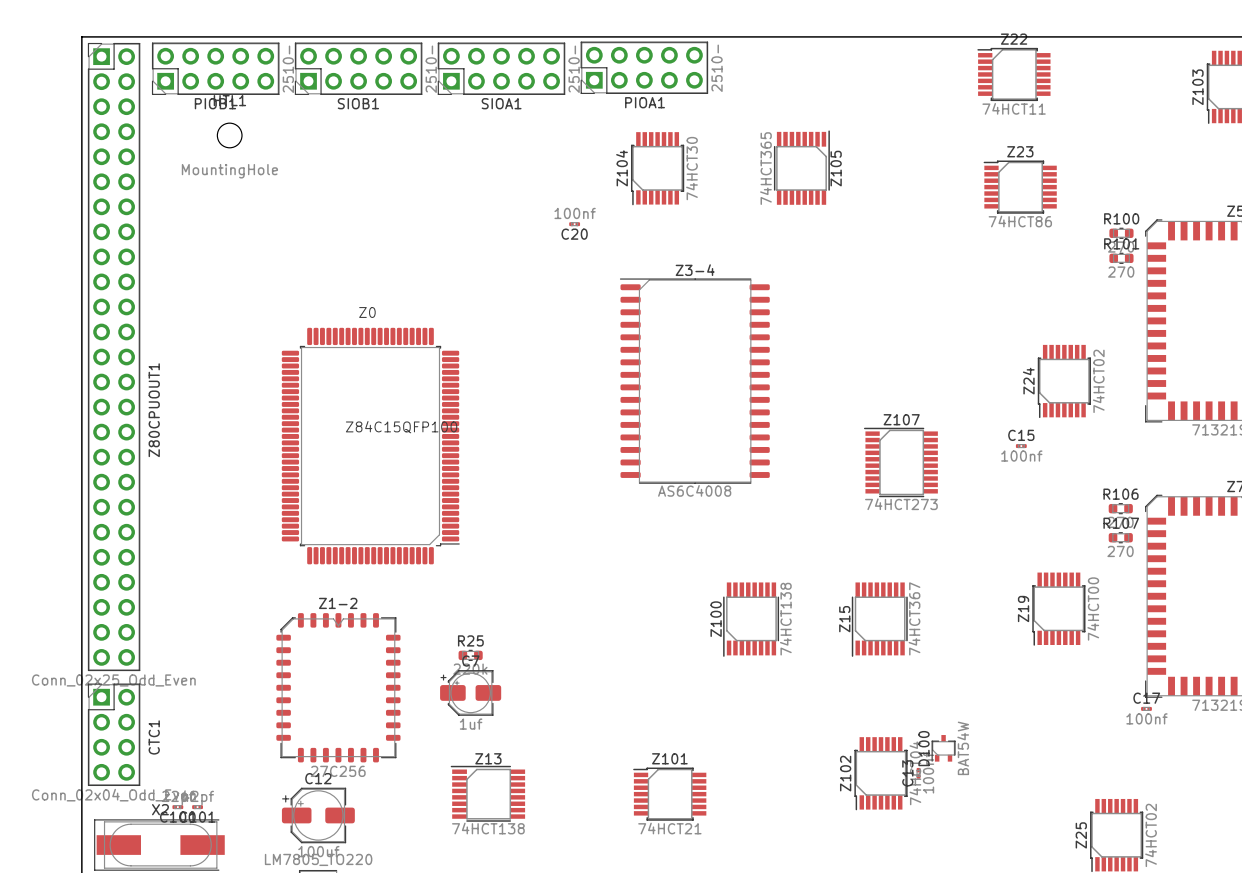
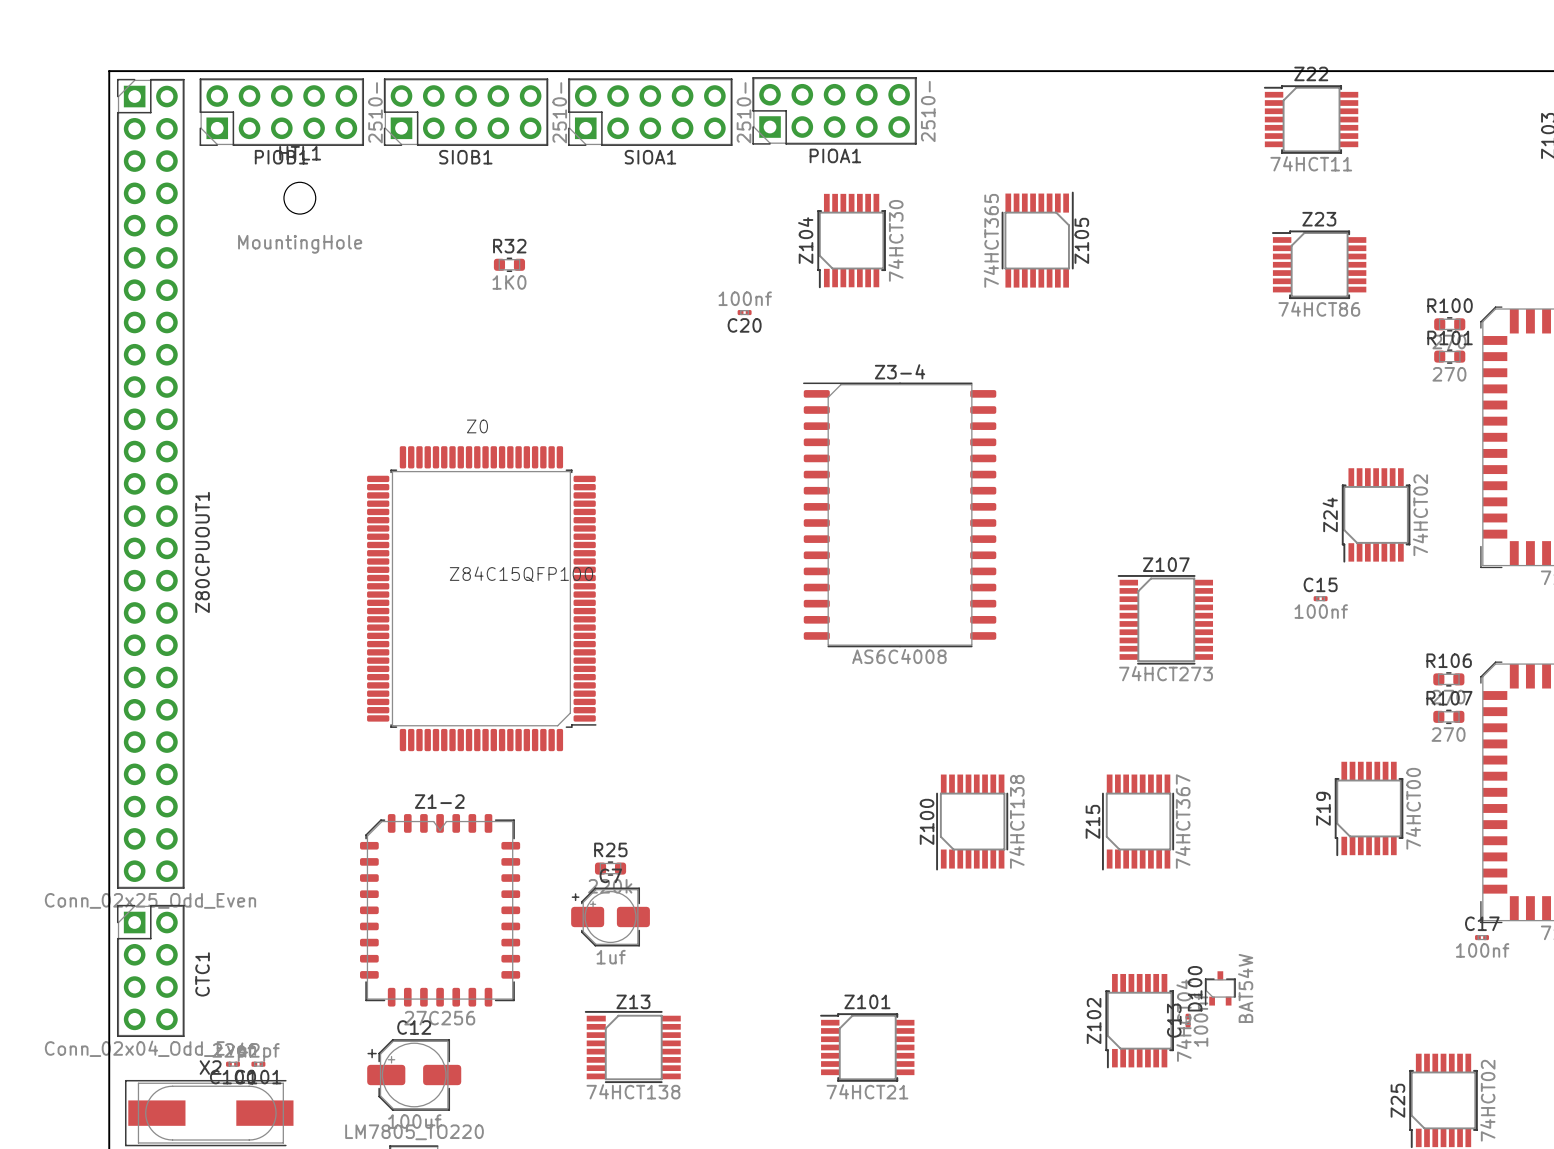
R32: none -> 1K0 (509, 264)

